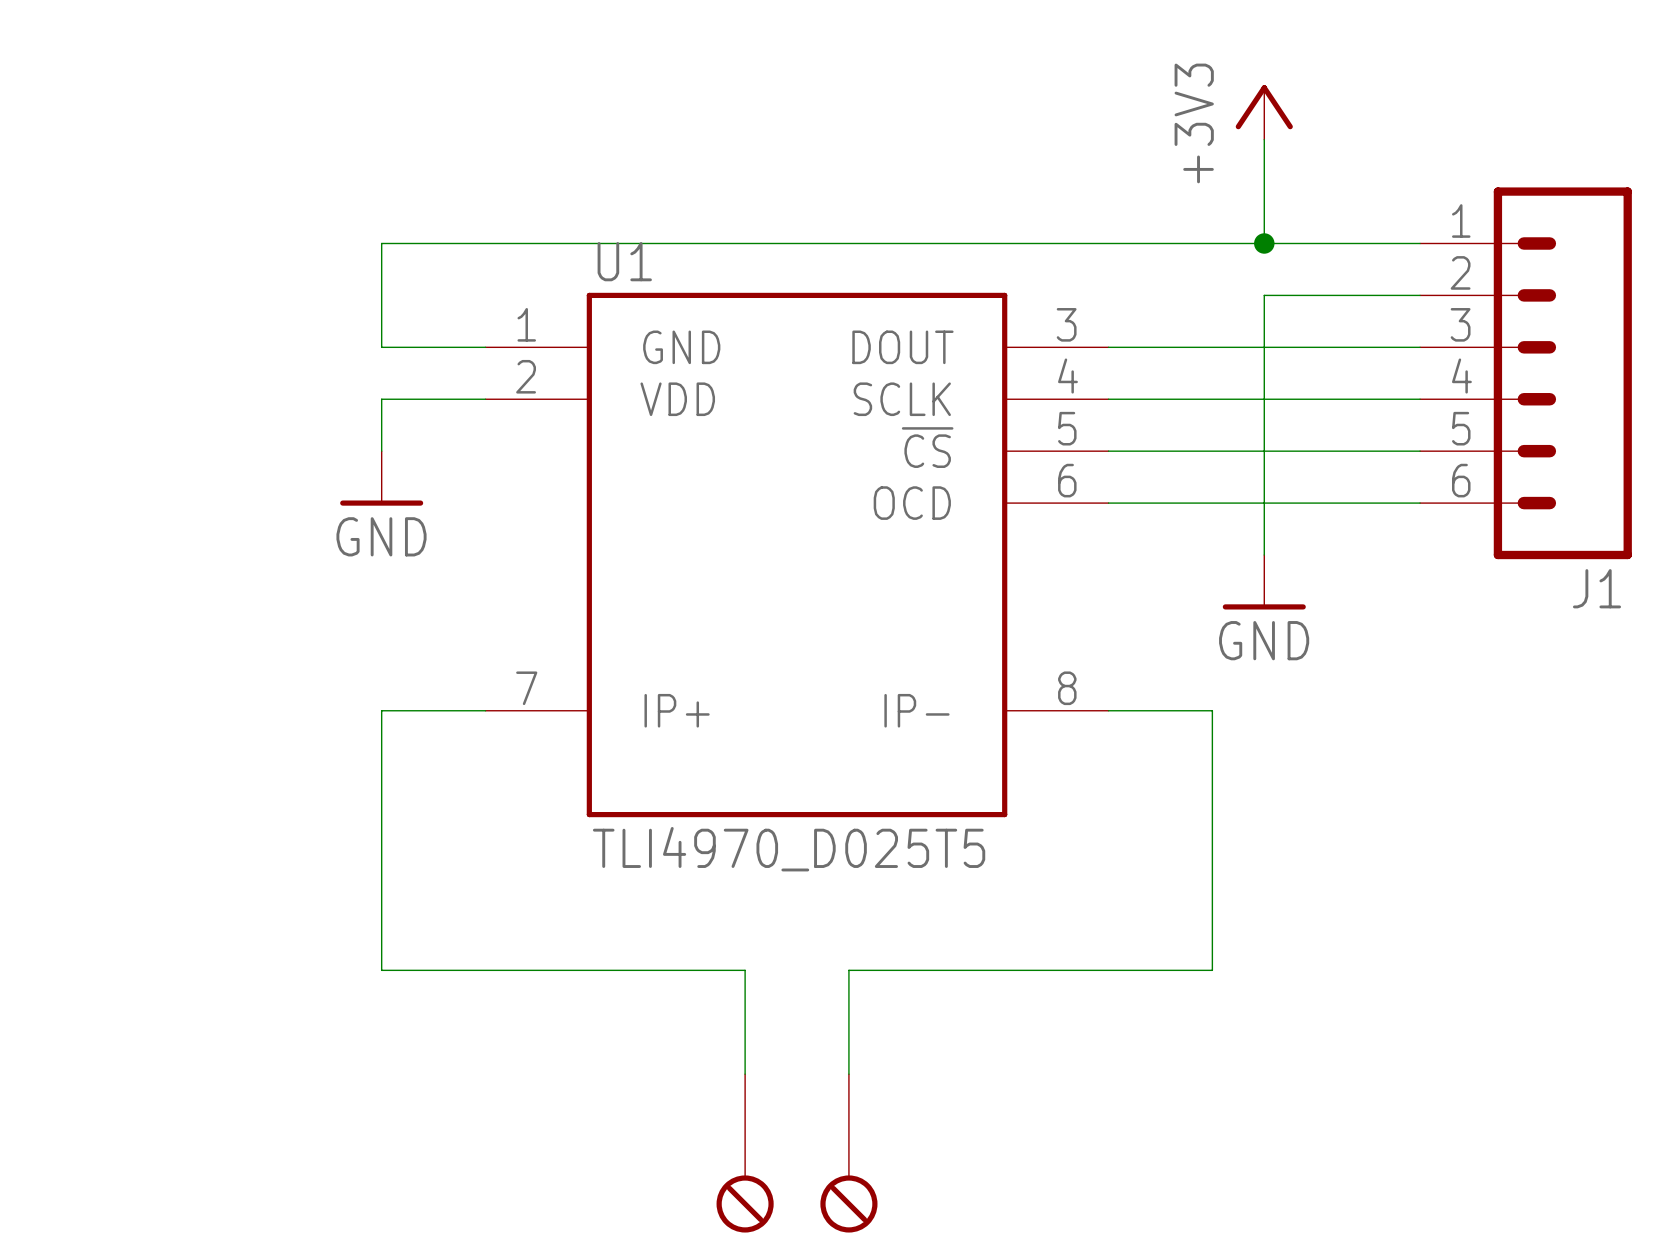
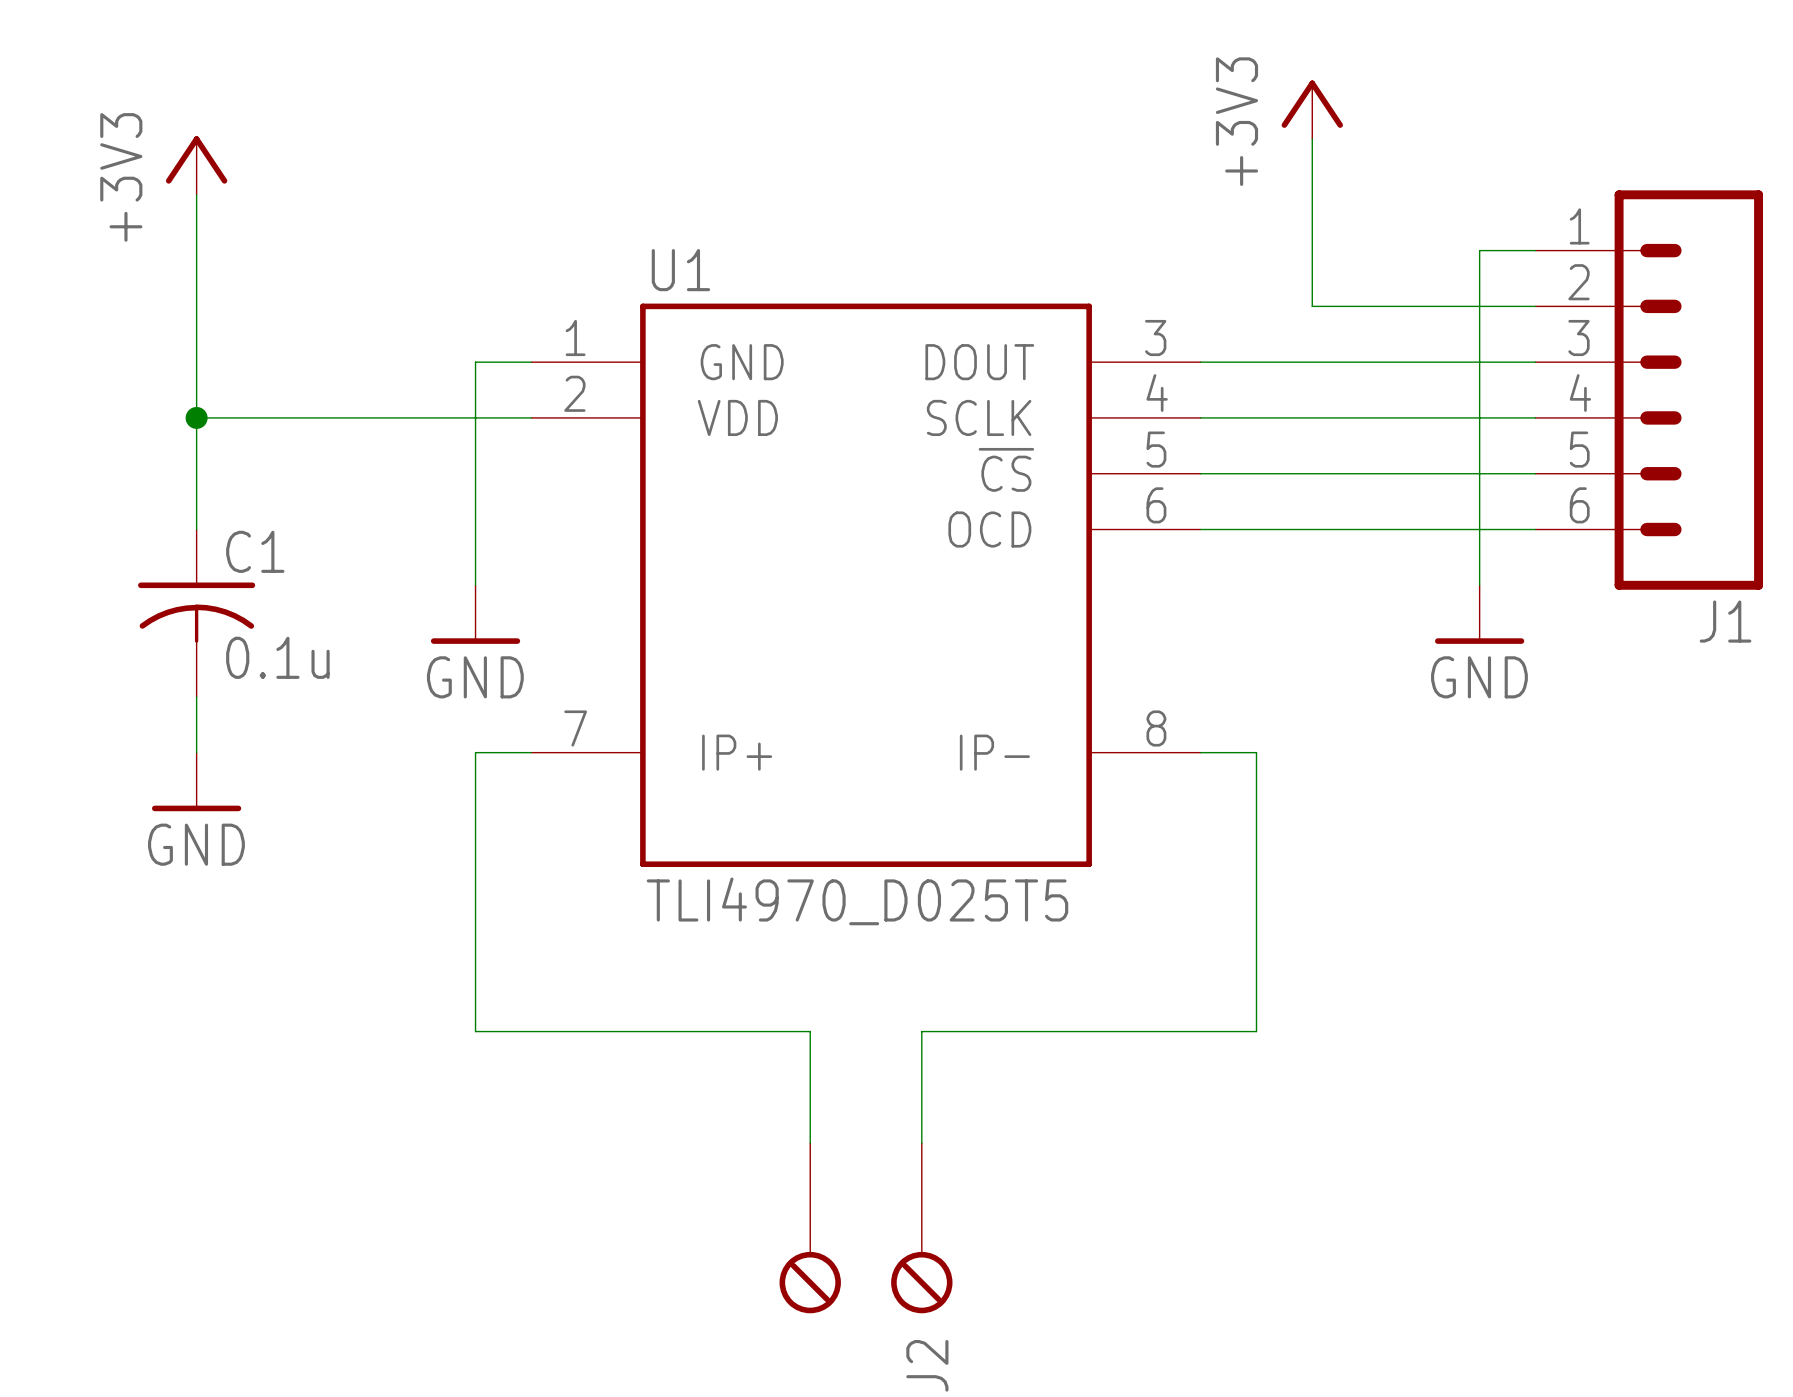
power symbol position: +3V3 (1264, 112) -> +3V3 (1312, 109)
wire: (1264, 139) (1264, 243) -> none
power symbol: none -> +3V3 (196, 165)
wire: none -> (196, 194) (196, 529)
junction: (1264, 243) -> none
wire: (1368, 243) (381, 243) (381, 347) (433, 347) -> (1479, 250) (1479, 585)
wire: (1264, 295) (1264, 555) -> (1368, 306) (1312, 306) (1312, 139)
wire: none -> (475, 362) (475, 585)
junction: none -> (196, 417)
wire: (381, 399) (381, 451) -> (419, 417) (196, 417)
power symbol position: GND (381, 478) -> GND (475, 614)
C1: none -> 0.1u (196, 613)
power symbol position: GND (1264, 582) -> GND (1479, 614)
wire: none -> (196, 696) (196, 752)
wire: (433, 710) (381, 710) (381, 970) (433, 970) -> (475, 752) (475, 1031)
wire: (1160, 710) (1212, 710) (1212, 970) (1160, 970) -> (1256, 752) (1256, 1031)
power symbol: none -> GND (196, 781)

